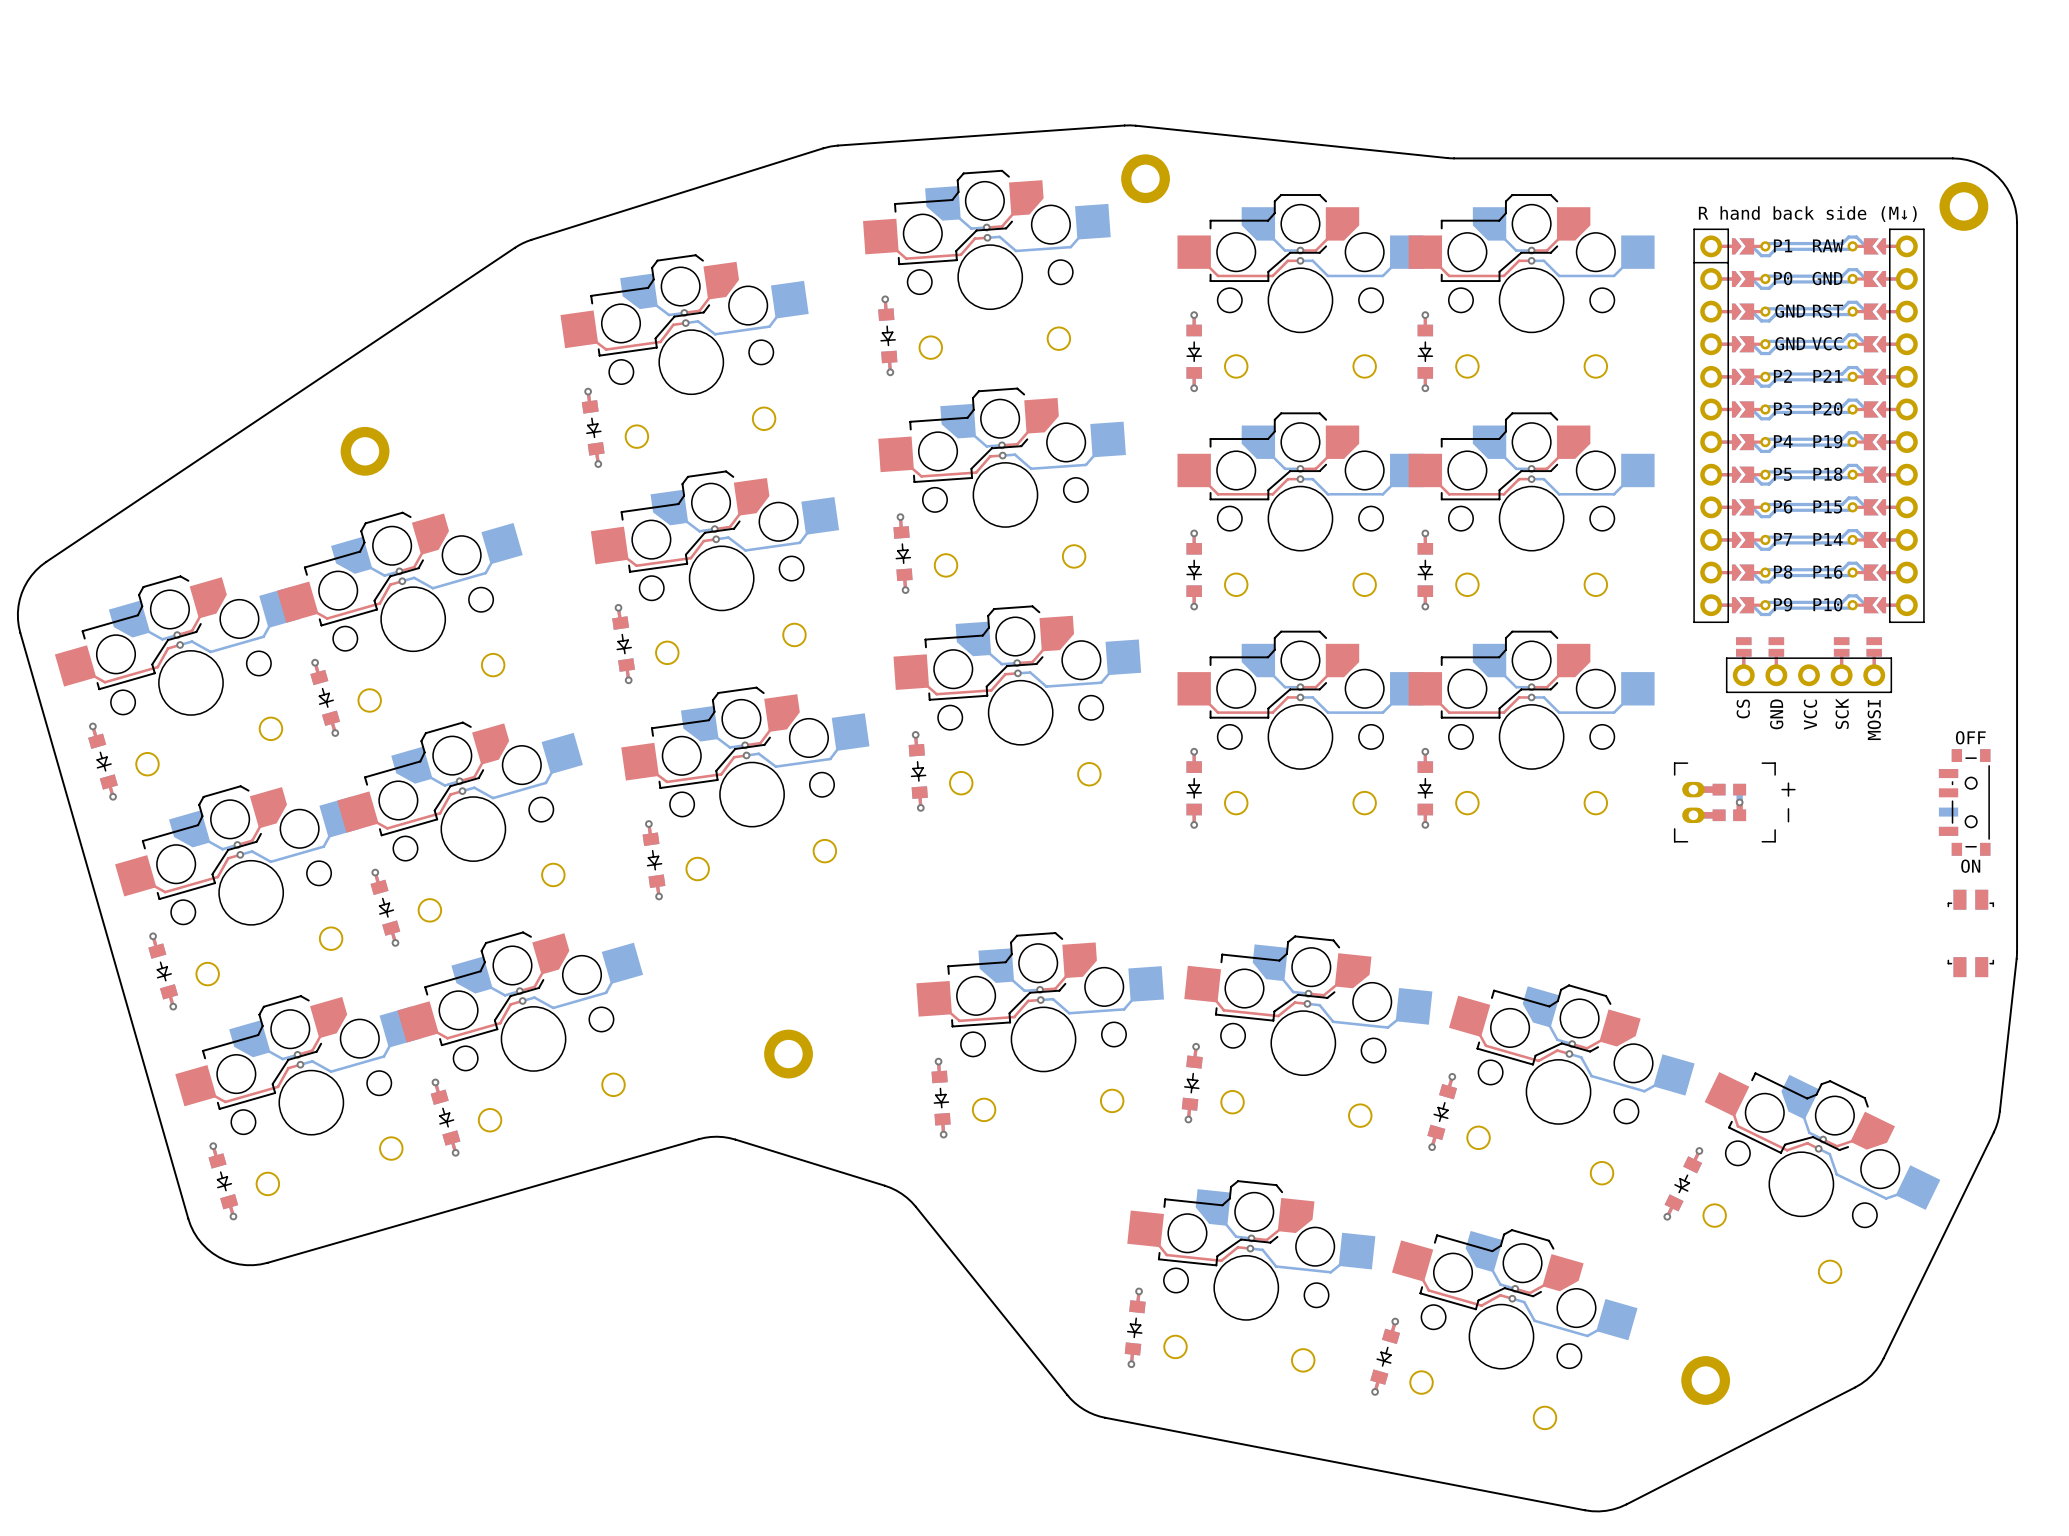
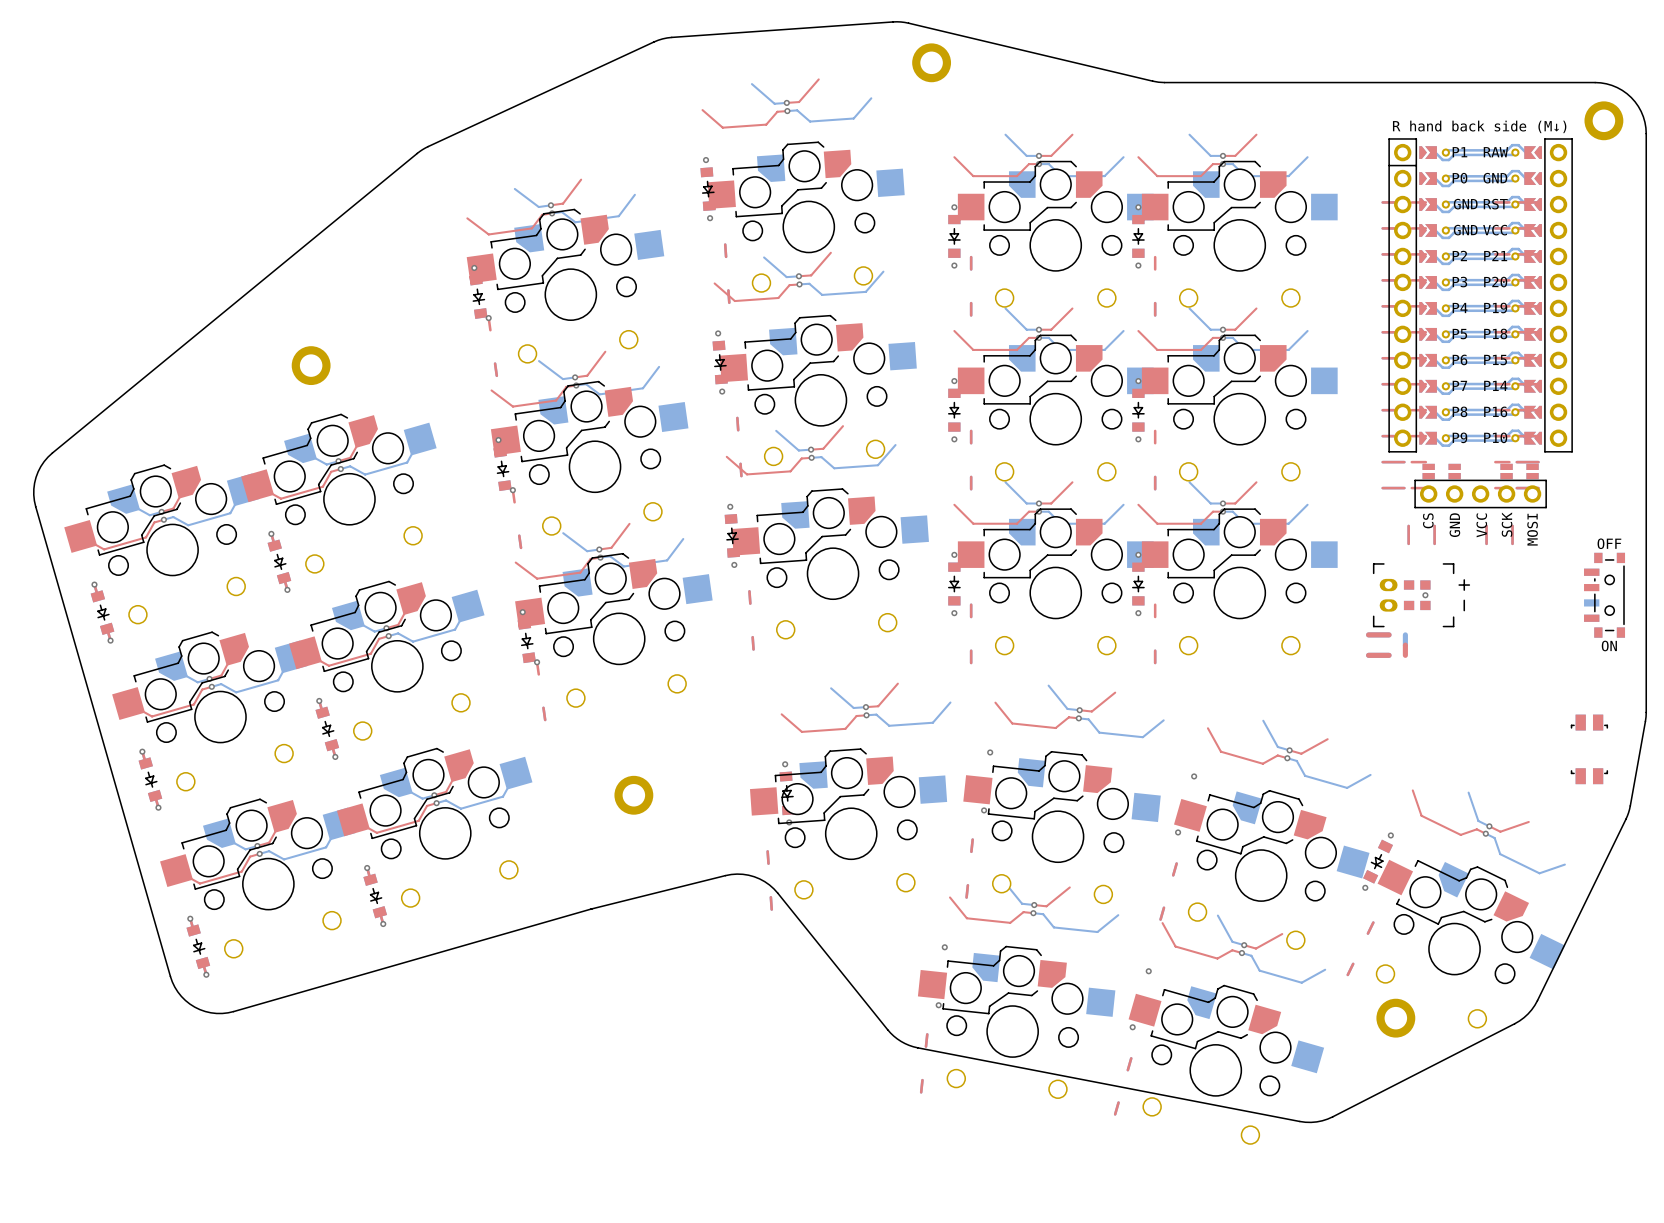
via: none -> (786, 102)
via: none -> (787, 111)
part position: (1145, 178) -> (931, 62)
via: none -> (1038, 155)
via: none -> (1222, 155)
via: none -> (706, 160)
top track: (1026, 198) (1002, 226) (986, 227) -> (818, 79) (799, 102) (786, 102)
via: none -> (1038, 164)
via: none -> (1222, 164)
bottom track: (942, 203) (971, 228) (986, 227) -> (751, 84) (774, 103) (786, 102)
part position: (1963, 206) -> (1603, 120)
bottom track: (1092, 221) (1070, 247) (1015, 250) (999, 236) (987, 237) -> (871, 98) (853, 118) (810, 121) (797, 110) (787, 111)
bottom track: (1258, 223) (1285, 250) (1300, 250) -> (1005, 134) (1026, 155) (1038, 155)
top track: (1342, 223) (1315, 250) (1300, 250) -> (1072, 134) (1051, 155) (1038, 155)
bottom track: (1489, 223) (1516, 250) (1531, 250) -> (1189, 134) (1210, 155) (1222, 155)
top track: (1573, 223) (1547, 250) (1531, 250) -> (1256, 134) (1235, 155) (1222, 155)
via: (986, 227) -> none
part: none -> (708, 189)
top track: (880, 236) (906, 258) (960, 254) (974, 238) (987, 237) -> (702, 110) (722, 127) (766, 124) (777, 111) (787, 111)
via: (987, 237) -> none
bottom track: (1768, 243) (1842, 243) (1848, 237) (1856, 237) (1865, 246) (1870, 246) -> (1448, 150) (1507, 150) (1512, 145) (1518, 145) (1525, 152) (1529, 152)
bottom track: (1747, 246) (1752, 246) (1761, 255) (1769, 255) (1775, 249) (1849, 249) -> (1431, 152) (1435, 152) (1442, 160) (1448, 160) (1453, 154) (1513, 154)
via: none -> (550, 205)
via: (1300, 250) -> none
via: (1531, 250) -> none
via: none -> (954, 207)
top track: (1194, 252) (1217, 275) (1272, 275) (1287, 260) (1300, 260) -> (954, 157) (973, 176) (1016, 176) (1029, 164) (1038, 164)
via: none -> (1138, 207)
bottom track: (1406, 252) (1382, 275) (1327, 275) (1312, 260) (1300, 260) -> (1123, 157) (1104, 176) (1060, 176) (1048, 164) (1038, 164)
top track: (1425, 252) (1449, 275) (1503, 275) (1519, 260) (1531, 260) -> (1138, 157) (1157, 176) (1200, 176) (1213, 164) (1222, 164)
bottom track: (1637, 252) (1614, 275) (1559, 275) (1543, 260) (1531, 260) -> (1307, 157) (1288, 176) (1244, 176) (1232, 164) (1222, 164)
via: none -> (552, 213)
via: (1300, 260) -> none
via: (1531, 260) -> none
bottom track: (1768, 276) (1842, 276) (1848, 269) (1856, 269) (1865, 278) (1870, 278) -> (1448, 176) (1507, 176) (1512, 171) (1518, 171) (1525, 178) (1529, 178)
bottom track: (1747, 278) (1752, 278) (1761, 288) (1769, 288) (1775, 281) (1849, 281) -> (1431, 178) (1435, 178) (1442, 185) (1448, 185) (1453, 180) (1513, 180)
top track: (722, 280) (699, 310) (684, 312) -> (581, 179) (563, 203) (550, 205)
bottom track: (639, 292) (669, 315) (684, 312) -> (514, 188) (538, 207) (550, 205)
bottom track: (789, 299) (769, 326) (715, 334) (698, 321) (685, 323) -> (634, 194) (618, 216) (575, 222) (561, 212) (552, 213)
via position: (885, 299) -> (710, 218)
bottom track: (1768, 308) (1842, 308) (1848, 302) (1856, 302) (1865, 311) (1870, 311) -> (1448, 202) (1507, 202) (1512, 197) (1518, 197) (1525, 204) (1529, 204)
bottom track: (1747, 311) (1752, 311) (1761, 320) (1769, 320) (1775, 314) (1849, 314) -> (1431, 204) (1435, 204) (1442, 211) (1448, 211) (1453, 206) (1513, 206)
via: (684, 312) -> none
via position: (1194, 315) -> (954, 265)
via position: (1425, 315) -> (1138, 265)
top track: (685, 323) (673, 324) (660, 341) (606, 349) (579, 329) -> (552, 213) (542, 214) (531, 228) (488, 234) (467, 218)
via: (685, 323) -> none
via: none -> (474, 267)
part: (887, 335) -> none
via: none -> (798, 276)
bottom track: (1768, 341) (1842, 341) (1848, 334) (1856, 334) (1865, 344) (1870, 344) -> (1448, 228) (1507, 228) (1512, 223) (1518, 223) (1525, 230) (1529, 230)
bottom track: (1747, 344) (1752, 344) (1761, 353) (1769, 353) (1775, 347) (1849, 347) -> (1431, 230) (1435, 230) (1442, 237) (1448, 237) (1453, 232) (1513, 232)
via: none -> (799, 284)
part position: (1194, 351) -> (954, 236)
part position: (1425, 351) -> (1138, 236)
via position: (890, 372) -> (718, 333)
bottom track: (1768, 374) (1842, 374) (1848, 367) (1856, 367) (1865, 376) (1870, 376) -> (1448, 254) (1507, 254) (1512, 249) (1518, 249) (1525, 256) (1529, 256)
bottom track: (1747, 376) (1752, 376) (1761, 386) (1769, 386) (1775, 379) (1849, 379) -> (1431, 256) (1435, 256) (1442, 263) (1448, 263) (1453, 258) (1513, 258)
via: (1194, 388) -> none
via: (1425, 388) -> none
via: none -> (1038, 329)
via: none -> (1222, 329)
bottom track: (1768, 406) (1842, 406) (1848, 400) (1856, 400) (1865, 409) (1870, 409) -> (1448, 280) (1507, 280) (1512, 275) (1518, 275) (1525, 282) (1529, 282)
bottom track: (1747, 409) (1752, 409) (1761, 418) (1769, 418) (1775, 412) (1849, 412) -> (1431, 282) (1435, 282) (1442, 289) (1448, 289) (1453, 284) (1513, 284)
top track: (1042, 415) (1017, 444) (1001, 445) -> (830, 252) (811, 275) (798, 276)
via: none -> (1038, 337)
via: none -> (1222, 337)
bottom track: (958, 421) (986, 446) (1001, 445) -> (764, 257) (786, 277) (798, 276)
part position: (1809, 425) -> (1480, 295)
part position: (593, 427) -> (478, 296)
bottom track: (1108, 439) (1086, 464) (1031, 468) (1015, 454) (1002, 455) -> (883, 271) (865, 291) (822, 294) (809, 283) (799, 284)
bottom track: (1768, 439) (1842, 439) (1848, 432) (1856, 432) (1865, 442) (1870, 442) -> (1448, 306) (1507, 306) (1512, 300) (1518, 300) (1525, 308) (1529, 308)
bottom track: (1258, 442) (1285, 468) (1300, 468) -> (1005, 308) (1026, 329) (1038, 329)
top track: (1342, 442) (1315, 468) (1300, 468) -> (1072, 308) (1051, 329) (1038, 329)
bottom track: (1489, 442) (1516, 468) (1531, 468) -> (1189, 308) (1210, 329) (1222, 329)
top track: (1573, 442) (1547, 468) (1531, 468) -> (1256, 308) (1235, 329) (1222, 329)
bottom track: (1747, 442) (1752, 442) (1761, 451) (1769, 451) (1775, 445) (1849, 445) -> (1431, 308) (1435, 308) (1442, 315) (1448, 315) (1453, 310) (1513, 310)
via: (1001, 445) -> none
part: none -> (720, 362)
top track: (896, 454) (921, 476) (976, 472) (990, 456) (1002, 455) -> (714, 283) (734, 301) (778, 298) (789, 285) (799, 284)
via: (1002, 455) -> none
via: (598, 464) -> none
via: none -> (575, 377)
via: (1300, 468) -> none
via: (1531, 468) -> none
via: none -> (954, 381)
top track: (1194, 470) (1217, 494) (1272, 494) (1287, 479) (1300, 479) -> (954, 330) (973, 349) (1016, 349) (1029, 337) (1038, 337)
via: none -> (1138, 381)
bottom track: (1406, 470) (1382, 494) (1327, 494) (1312, 479) (1300, 479) -> (1123, 330) (1104, 349) (1060, 349) (1048, 337) (1038, 337)
top track: (1425, 470) (1449, 494) (1503, 494) (1519, 479) (1531, 479) -> (1138, 330) (1157, 349) (1200, 349) (1213, 337) (1222, 337)
bottom track: (1637, 470) (1614, 494) (1559, 494) (1543, 479) (1531, 479) -> (1307, 330) (1288, 349) (1244, 349) (1232, 337) (1222, 337)
bottom track: (1768, 471) (1842, 471) (1848, 465) (1856, 465) (1865, 474) (1870, 474) -> (1448, 332) (1507, 332) (1512, 326) (1518, 326) (1525, 334) (1529, 334)
bottom track: (1747, 474) (1752, 474) (1761, 484) (1769, 484) (1775, 477) (1849, 477) -> (1431, 334) (1435, 334) (1442, 341) (1448, 341) (1453, 336) (1513, 336)
via: none -> (576, 385)
via: (1300, 479) -> none
via: (1531, 479) -> none
top track: (752, 496) (730, 526) (714, 529) -> (605, 351) (587, 375) (575, 377)
bottom track: (1768, 504) (1842, 504) (1848, 498) (1856, 498) (1865, 507) (1870, 507) -> (1448, 358) (1507, 358) (1512, 352) (1518, 352) (1525, 360) (1529, 360)
bottom track: (1747, 507) (1752, 507) (1761, 516) (1769, 516) (1775, 510) (1849, 510) -> (1431, 360) (1435, 360) (1442, 367) (1448, 367) (1453, 362) (1513, 362)
bottom track: (669, 508) (699, 531) (714, 529) -> (539, 361) (562, 379) (575, 377)
bottom track: (820, 515) (799, 542) (745, 550) (728, 537) (716, 539) -> (659, 366) (642, 388) (599, 394) (586, 384) (576, 385)
via position: (900, 517) -> (722, 391)
via: (714, 529) -> none
via position: (1194, 533) -> (954, 439)
via position: (1425, 533) -> (1138, 439)
bottom track: (1768, 537) (1842, 537) (1848, 530) (1856, 530) (1865, 539) (1870, 539) -> (1448, 384) (1507, 384) (1512, 378) (1518, 378) (1525, 386) (1529, 386)
top track: (716, 539) (703, 541) (690, 558) (636, 565) (609, 545) -> (576, 385) (566, 386) (556, 400) (512, 406) (491, 390)
via: (716, 539) -> none
bottom track: (1747, 539) (1752, 539) (1761, 549) (1769, 549) (1775, 542) (1849, 542) -> (1431, 386) (1435, 386) (1442, 393) (1448, 393) (1453, 388) (1513, 388)
via: none -> (498, 440)
part: (903, 553) -> none
via: none -> (811, 449)
via: none -> (811, 457)
bottom track: (1768, 569) (1842, 569) (1848, 563) (1856, 563) (1865, 572) (1870, 572) -> (1448, 410) (1507, 410) (1512, 404) (1518, 404) (1525, 412) (1529, 412)
part position: (1194, 570) -> (954, 410)
part position: (1425, 570) -> (1138, 410)
bottom track: (1747, 572) (1752, 572) (1761, 581) (1769, 581) (1775, 575) (1849, 575) -> (1431, 412) (1435, 412) (1442, 419) (1448, 419) (1453, 414) (1513, 414)
via position: (905, 590) -> (730, 506)
bottom track: (1768, 602) (1842, 602) (1848, 595) (1856, 595) (1865, 605) (1870, 605) -> (1448, 435) (1507, 435) (1512, 430) (1518, 430) (1525, 438) (1529, 438)
bottom track: (1747, 605) (1752, 605) (1761, 614) (1769, 614) (1775, 608) (1849, 608) -> (1431, 438) (1435, 438) (1442, 445) (1448, 445) (1453, 440) (1513, 440)
via: (1194, 606) -> none
via: (1425, 606) -> none
via: none -> (1038, 503)
via: none -> (1222, 503)
board edge: (20, 632) (17, 612) (21, 593) (27, 581) (40, 565) (518, 245) (830, 146) (1130, 125) (1450, 158) (1960, 158) (1974, 162) (1987, 168) (2003, 182) (2013, 201) (2017, 222) (2017, 951) (1999, 1111) (1993, 1132) (1883, 1358) (1876, 1370) (1861, 1383) (1626, 1504) (1613, 1509) (1599, 1511) (1585, 1510) (1105, 1417) (1084, 1409) (1070, 1399) (915, 1206) (901, 1193) (884, 1185) (735, 1139) (717, 1136) (698, 1139) -> (36, 510) (33, 494) (34, 483) (38, 471) (48, 457) (419, 151) (662, 38) (900, 21) (1158, 82) (1595, 82) (1617, 87) (1635, 101) (1643, 116) (1646, 133) (1646, 716) (1627, 816) (1537, 1000) (1523, 1017) (1332, 1116) (1322, 1120) (1305, 1122) (917, 1047) (905, 1043) (887, 1029) (773, 888) (754, 876) (737, 874) (725, 875) (576, 913)
top track: (1057, 633) (1032, 662) (1017, 663) -> (842, 426) (823, 448) (811, 449)
via: none -> (1038, 511)
via: none -> (1222, 511)
bottom track: (973, 639) (1001, 664) (1017, 663) -> (776, 430) (798, 450) (811, 449)
part position: (623, 644) -> (502, 468)
bottom track: (1123, 657) (1101, 682) (1046, 686) (1030, 672) (1017, 673) -> (895, 445) (877, 465) (834, 468) (821, 457) (811, 457)
bottom track: (1258, 660) (1285, 687) (1300, 687) -> (1005, 482) (1026, 503) (1038, 503)
top track: (1342, 660) (1315, 687) (1300, 687) -> (1072, 482) (1051, 503) (1038, 503)
bottom track: (1489, 660) (1516, 687) (1531, 687) -> (1189, 482) (1210, 503) (1222, 503)
top track: (1573, 660) (1547, 687) (1531, 687) -> (1256, 482) (1235, 503) (1222, 503)
via: (1017, 663) -> none
part: none -> (732, 535)
part position: (1809, 665) -> (1480, 486)
top track: (911, 672) (936, 694) (991, 690) (1005, 674) (1017, 673) -> (726, 456) (747, 474) (790, 471) (801, 458) (811, 457)
via: (1017, 673) -> none
via: (628, 680) -> none
via: none -> (599, 549)
via: (1300, 687) -> none
via: (1531, 687) -> none
top track: (1194, 688) (1217, 712) (1272, 712) (1287, 697) (1300, 697) -> (954, 504) (973, 523) (1016, 523) (1029, 511) (1038, 511)
bottom track: (1406, 688) (1382, 712) (1327, 712) (1312, 697) (1300, 697) -> (1123, 504) (1104, 523) (1060, 523) (1048, 511) (1038, 511)
top track: (1425, 688) (1449, 712) (1503, 712) (1519, 697) (1531, 697) -> (1138, 504) (1157, 523) (1200, 523) (1213, 511) (1222, 511)
bottom track: (1637, 688) (1614, 712) (1559, 712) (1543, 697) (1531, 697) -> (1307, 504) (1288, 523) (1244, 523) (1232, 511) (1222, 511)
via: none -> (954, 554)
via: none -> (1138, 554)
via: none -> (600, 557)
via: (1300, 697) -> none
via: (1531, 697) -> none
top track: (783, 713) (760, 743) (745, 745) -> (629, 523) (611, 547) (599, 549)
bottom track: (699, 724) (729, 747) (745, 745) -> (563, 533) (587, 551) (599, 549)
bottom track: (850, 732) (830, 759) (775, 766) (758, 753) (746, 755) -> (683, 539) (667, 560) (623, 566) (610, 556) (600, 557)
via position: (915, 734) -> (734, 564)
part: none -> (1421, 595)
via: (745, 745) -> none
via position: (1194, 751) -> (954, 613)
via position: (1425, 751) -> (1138, 613)
top track: (746, 755) (734, 757) (721, 774) (667, 781) (640, 761) -> (600, 557) (590, 559) (580, 572) (537, 578) (515, 562)
via: (746, 755) -> none
via: none -> (522, 612)
part: (918, 771) -> none
part position: (1194, 788) -> (954, 584)
part position: (1425, 788) -> (1138, 584)
part: (1734, 802) -> none
via position: (1739, 802) -> (1425, 595)
part position: (1964, 802) -> (1604, 595)
via: (920, 807) -> none
via: (1194, 824) -> none
via: (1425, 824) -> none
part position: (653, 860) -> (526, 641)
via: none -> (865, 707)
via: none -> (1079, 710)
via: none -> (866, 715)
via: none -> (1078, 718)
via: (659, 896) -> none
via: none -> (1289, 750)
via: none -> (990, 752)
via: none -> (1287, 758)
via: none -> (785, 764)
top track: (1080, 960) (1055, 988) (1040, 989) -> (897, 683) (878, 706) (865, 707)
bottom track: (1269, 962) (1293, 992) (1308, 993) -> (1048, 685) (1067, 708) (1079, 710)
bottom track: (996, 966) (1024, 990) (1040, 989) -> (831, 688) (853, 708) (865, 707)
via: none -> (1194, 776)
top track: (1353, 971) (1323, 995) (1308, 993) -> (1115, 692) (1091, 711) (1079, 710)
bottom track: (1146, 983) (1124, 1009) (1069, 1013) (1053, 999) (1040, 1000) -> (950, 702) (932, 722) (889, 725) (876, 714) (866, 715)
top track: (1202, 984) (1223, 1010) (1278, 1016) (1294, 1002) (1307, 1003) -> (995, 702) (1012, 723) (1055, 728) (1068, 717) (1078, 718)
part: none -> (787, 793)
via: (1040, 989) -> none
via: (1308, 993) -> none
top track: (934, 998) (959, 1020) (1014, 1017) (1028, 1000) (1040, 1000) -> (781, 714) (801, 731) (845, 728) (856, 715) (866, 715)
via: (1040, 1000) -> none
bottom track: (1307, 1003) (1319, 1005) (1333, 1021) (1387, 1027) (1414, 1006) -> (1078, 718) (1088, 719) (1099, 732) (1142, 737) (1163, 720)
via: (1307, 1003) -> none
bottom track: (1539, 1006) (1557, 1039) (1572, 1044) -> (1263, 720) (1277, 746) (1289, 750)
top track: (1469, 1016) (1485, 1045) (1538, 1060) (1557, 1050) (1569, 1053) -> (1207, 728) (1220, 751) (1262, 763) (1277, 755) (1287, 758)
via: none -> (789, 822)
top track: (1620, 1030) (1587, 1048) (1572, 1044) -> (1327, 739) (1301, 753) (1289, 750)
via: none -> (1489, 826)
via: none -> (1485, 833)
via: none -> (1390, 835)
via: (1572, 1044) -> none
via position: (1196, 1046) -> (984, 810)
bottom track: (1569, 1053) (1581, 1057) (1591, 1076) (1644, 1091) (1673, 1074) -> (1287, 758) (1296, 760) (1305, 775) (1347, 787) (1370, 774)
via: (1569, 1053) -> none
part position: (788, 1054) -> (633, 795)
via: (938, 1061) -> none
via position: (1452, 1076) -> (1178, 832)
part: (1192, 1083) -> none
top track: (1726, 1094) (1737, 1126) (1787, 1150) (1807, 1143) (1818, 1148) -> (1412, 790) (1421, 815) (1460, 834) (1476, 829) (1485, 833)
bottom track: (1797, 1097) (1809, 1132) (1823, 1139) -> (1468, 792) (1478, 820) (1489, 826)
part: (941, 1098) -> none
part: (1442, 1112) -> none
via: (1188, 1119) -> none
via: none -> (1034, 905)
via: (943, 1134) -> none
top track: (1872, 1134) (1837, 1146) (1823, 1139) -> (1528, 821) (1500, 831) (1489, 826)
via: none -> (1033, 913)
via: (1823, 1139) -> none
via: (1432, 1147) -> none
bottom track: (1818, 1148) (1829, 1154) (1836, 1174) (1886, 1198) (1918, 1187) -> (1485, 833) (1494, 838) (1500, 854) (1539, 873) (1564, 864)
via: (1818, 1148) -> none
via position: (1699, 1150) -> (1365, 887)
via: none -> (1244, 945)
via: none -> (944, 947)
part position: (1683, 1183) -> (1378, 861)
via: none -> (1241, 953)
bottom track: (1212, 1207) (1236, 1236) (1251, 1238) -> (1003, 880) (1022, 903) (1034, 905)
via: none -> (1148, 971)
top track: (1296, 1216) (1266, 1239) (1251, 1238) -> (1069, 887) (1046, 906) (1034, 905)
via: (1667, 1216) -> none
top track: (1145, 1228) (1166, 1255) (1221, 1260) (1237, 1247) (1250, 1248) -> (950, 897) (966, 918) (1010, 922) (1023, 912) (1033, 913)
via: (1251, 1238) -> none
bottom track: (1250, 1248) (1262, 1249) (1276, 1266) (1330, 1272) (1357, 1251) -> (1033, 913) (1043, 914) (1053, 927) (1097, 932) (1118, 915)
via: (1250, 1248) -> none
bottom track: (1482, 1251) (1500, 1284) (1515, 1288) -> (1217, 915) (1232, 941) (1244, 945)
top track: (1412, 1261) (1428, 1290) (1481, 1305) (1500, 1295) (1512, 1298) -> (1162, 923) (1175, 946) (1217, 958) (1232, 950) (1241, 953)
top track: (1562, 1274) (1530, 1293) (1515, 1288) -> (1282, 934) (1256, 948) (1244, 945)
via: (1515, 1288) -> none
via position: (1139, 1291) -> (938, 1005)
bottom track: (1512, 1298) (1524, 1302) (1534, 1320) (1587, 1335) (1616, 1319) -> (1241, 953) (1251, 955) (1259, 970) (1301, 982) (1325, 969)
via: (1512, 1298) -> none
via position: (1395, 1321) -> (1132, 1027)
part: (1135, 1327) -> none
part: (1385, 1356) -> none
via: (1131, 1364) -> none
part position: (1705, 1380) -> (1395, 1018)
via: (1375, 1391) -> none

